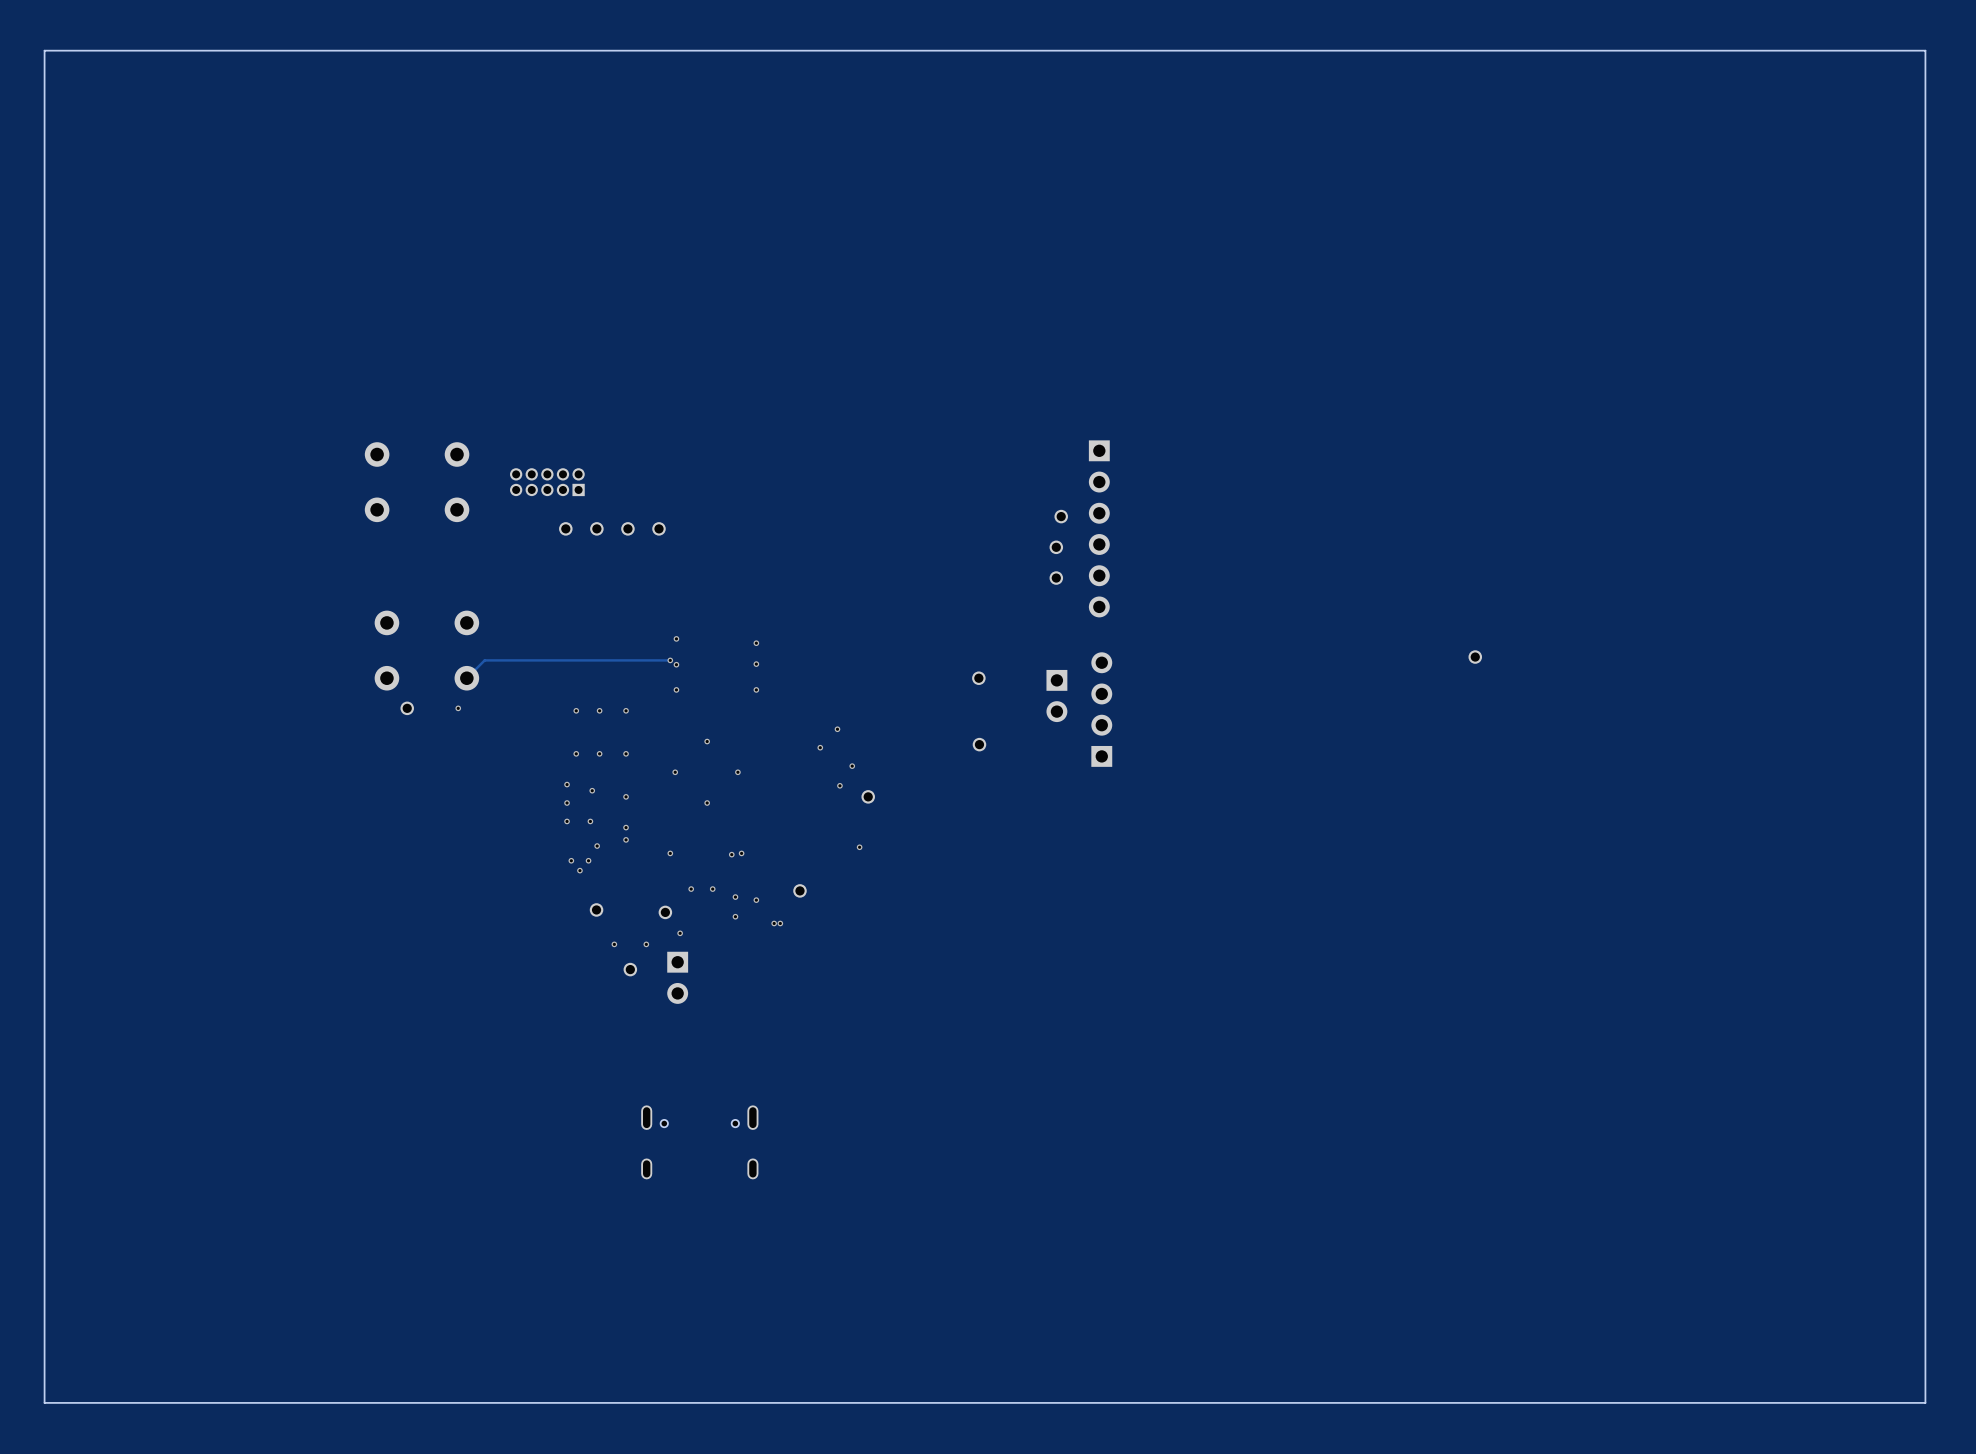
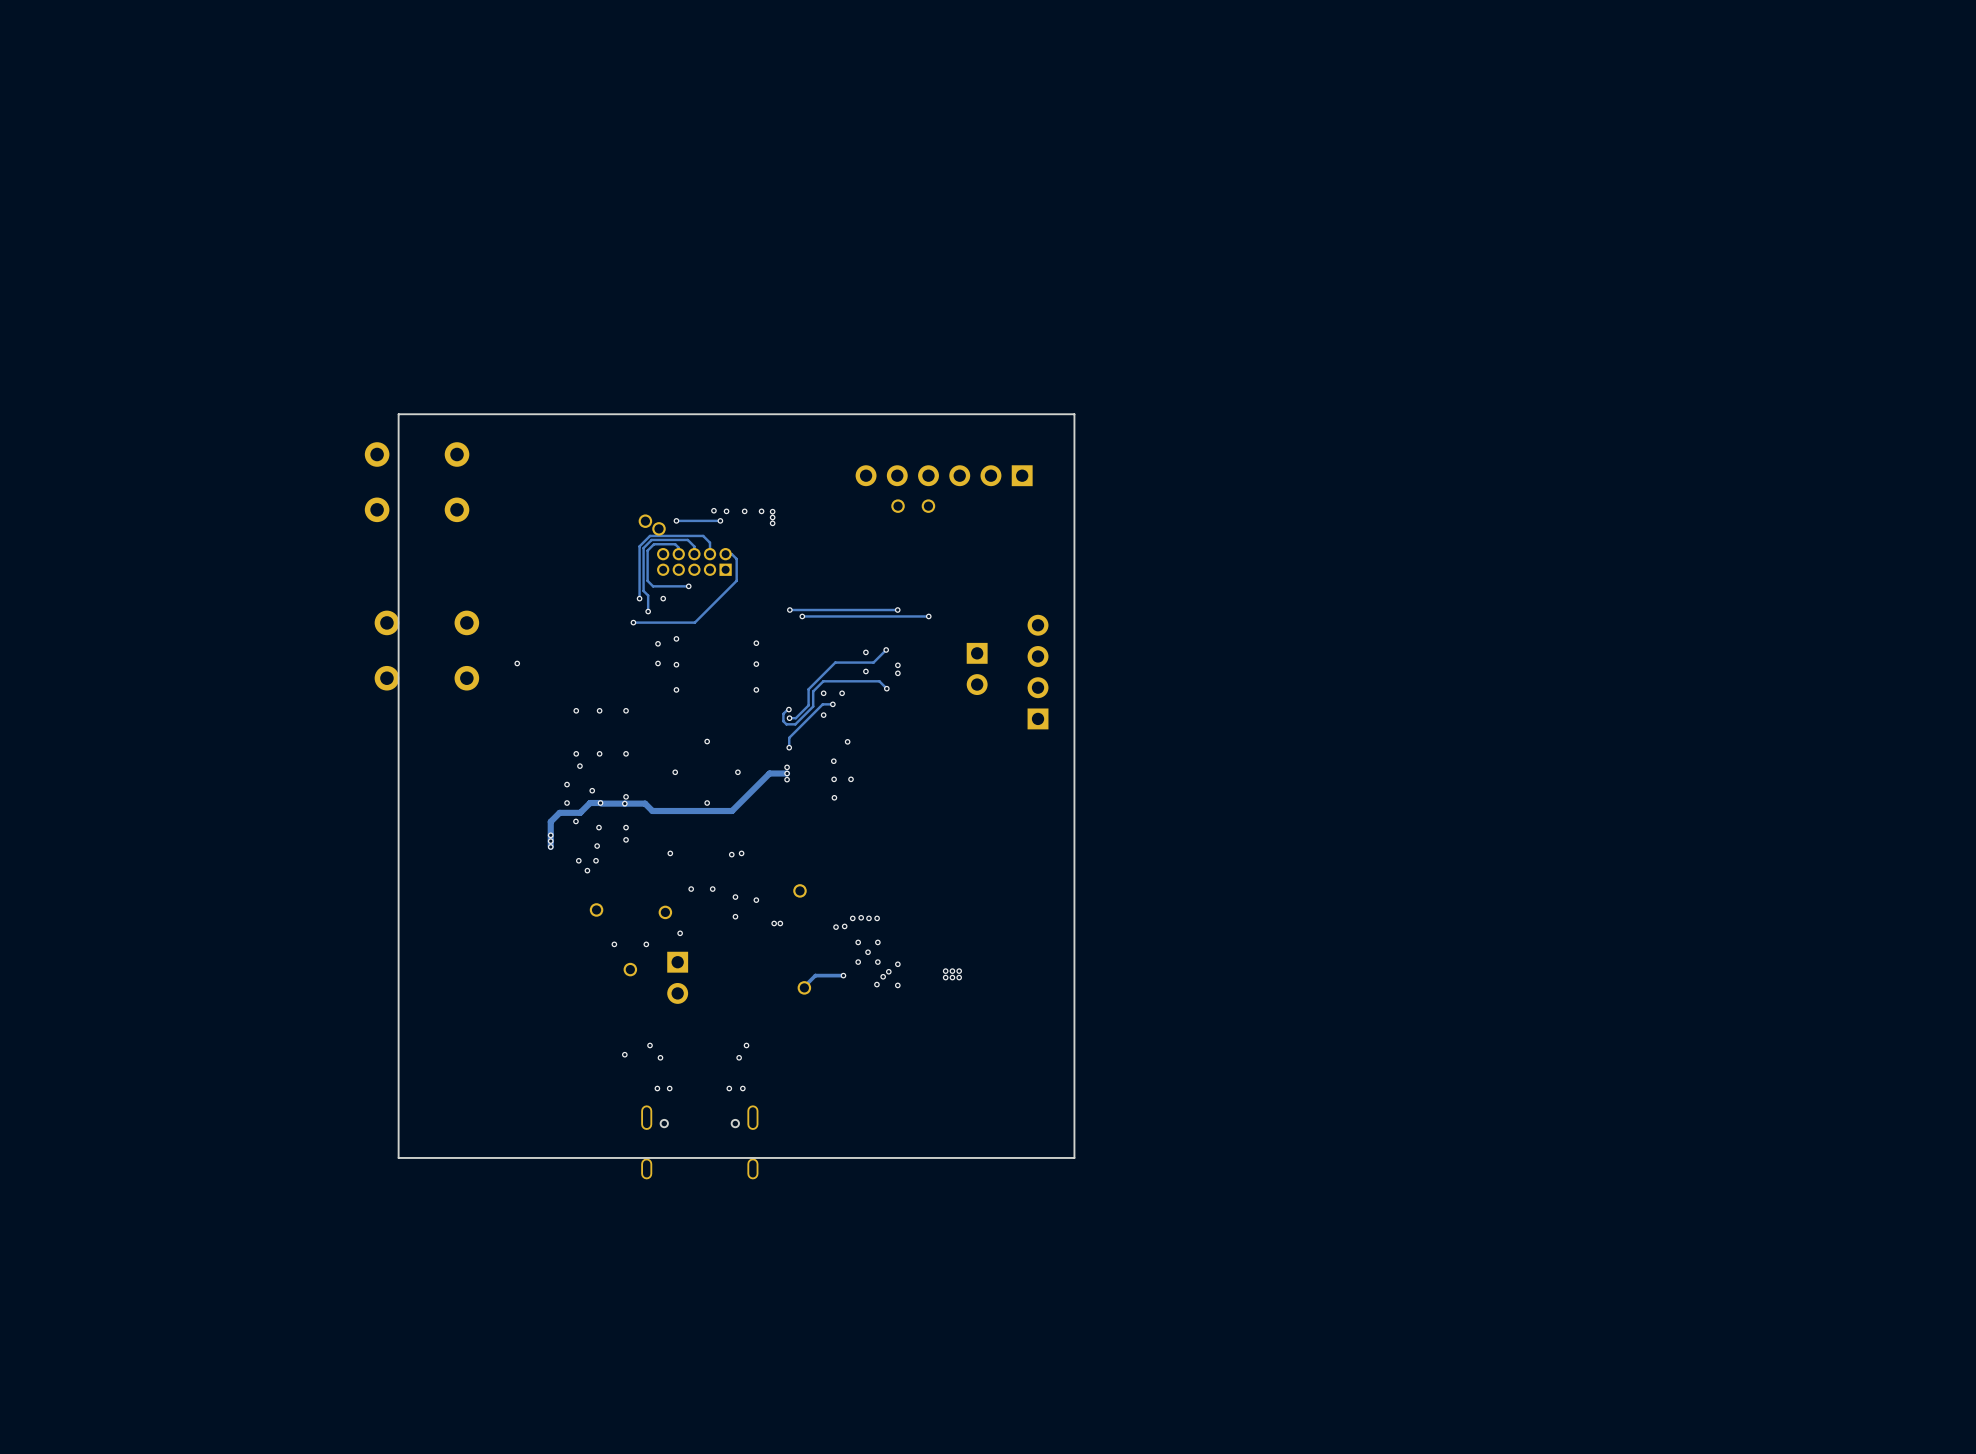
board edge: (1925, 50) (44, 50) (44, 1402) (1925, 1402) (1925, 50) -> none
board edge: none -> (1074, 414) (398, 414) (398, 1157) (1074, 1157) (1074, 414)
part position: (547, 482) -> (694, 561)
part: none -> (898, 506)
part: none -> (928, 506)
via: none -> (713, 510)
via: none -> (726, 511)
via: none -> (744, 511)
via: none -> (761, 511)
via: none -> (772, 511)
part: (1061, 516) -> none
via: none -> (772, 517)
via: none -> (676, 520)
track: none -> (720, 520) (676, 520)
via: none -> (720, 520)
via: none -> (772, 523)
part: (565, 528) -> none
part: (596, 528) -> none
part position: (627, 528) -> (645, 521)
part rotation: 0° (1099, 528) -> 90° clockwise (944, 475)
part position: (1099, 528) -> (944, 475)
part: (1056, 547) -> none
track: none -> (678, 554) (678, 547) (675, 544) (654, 544) (647, 550) (647, 580) (653, 586) (688, 586)
track: none -> (694, 554) (694, 546) (687, 539) (651, 539) (643, 548) (643, 590) (648, 595) (648, 611)
track: none -> (710, 554) (710, 542) (703, 535) (650, 535) (639, 546) (639, 598)
track: none -> (725, 554) (731, 554) (736, 558) (736, 580) (694, 622) (633, 622)
part: (1056, 578) -> none
via: none -> (688, 586)
via: none -> (639, 598)
via: none -> (663, 598)
via: none -> (789, 610)
track: none -> (897, 610) (789, 610)
via: none -> (897, 610)
via: none -> (648, 611)
via: none -> (802, 616)
track: none -> (928, 616) (802, 616)
via: none -> (928, 616)
via: none -> (633, 622)
via: none -> (658, 643)
track: none -> (886, 649) (873, 662) (835, 662) (808, 689) (808, 705) (795, 718) (789, 718)
via: none -> (886, 649)
via: none -> (865, 652)
part: (1475, 657) -> none
track: (670, 660) (484, 660) (466, 678) -> none
via: (670, 660) -> none
via: none -> (517, 663)
via: none -> (658, 663)
via: none -> (897, 665)
via: none -> (865, 671)
part footprint: [972, 671, 986, 686] -> [966, 642, 988, 696]
via: none -> (897, 673)
track: none -> (886, 688) (879, 681) (823, 681) (813, 691) (813, 706) (795, 724) (786, 724) (783, 721) (783, 713) (788, 709)
via: none -> (886, 688)
via: none -> (823, 693)
via: none -> (842, 693)
part: (1056, 696) -> none
track: none -> (832, 704) (822, 704) (789, 737) (789, 747)
via: none -> (832, 704)
part: (407, 708) -> none
via: (458, 708) -> none
via: none -> (788, 709)
part position: (1101, 709) -> (1038, 672)
via: none -> (823, 715)
via: none -> (789, 718)
via: (837, 729) -> none
via: none -> (847, 741)
part: (979, 744) -> none
via: none -> (789, 747)
via: (820, 747) -> none
via: none -> (833, 761)
via: none -> (579, 766)
via: (852, 766) -> none
via: none -> (787, 767)
track: none -> (787, 773) (769, 773) (732, 811) (652, 811) (645, 803) (601, 803)
via: none -> (787, 773)
via: none -> (787, 779)
via: none -> (834, 779)
via: none -> (851, 779)
via: (839, 785) -> none
part: (868, 796) -> none
via: none -> (834, 797)
track: none -> (600, 803) (590, 803) (580, 812) (559, 812) (550, 821) (550, 846)
via: none -> (600, 803)
via: none -> (624, 803)
via: (567, 821) -> none
via: none -> (575, 821)
via: (590, 821) -> none
via: none -> (599, 827)
via: none -> (550, 835)
via: none -> (550, 841)
via: none -> (550, 846)
via: (859, 847) -> none
via: (571, 860) -> none
via: none -> (578, 860)
via: (588, 860) -> none
via: none -> (596, 860)
via: (579, 870) -> none
via: none -> (587, 870)
via: none -> (861, 917)
via: none -> (852, 918)
via: none -> (868, 918)
via: none -> (877, 918)
via: none -> (844, 926)
via: none -> (836, 927)
via: none -> (858, 942)
via: none -> (877, 942)
via: none -> (868, 952)
via: none -> (858, 962)
via: none -> (877, 962)
via: none -> (897, 964)
via: none -> (888, 971)
via: none -> (945, 971)
via: none -> (952, 971)
via: none -> (959, 971)
track: none -> (843, 975) (815, 975) (804, 987)
via: none -> (843, 975)
via: none -> (883, 976)
via: none -> (945, 977)
via: none -> (952, 977)
via: none -> (959, 977)
via: none -> (876, 984)
via: none -> (897, 985)
part: none -> (804, 987)
via: none -> (650, 1045)
via: none -> (746, 1045)
via: none -> (624, 1054)
via: none -> (660, 1057)
via: none -> (739, 1057)
via: none -> (657, 1088)
via: none -> (669, 1088)
via: none -> (729, 1088)
via: none -> (742, 1088)

